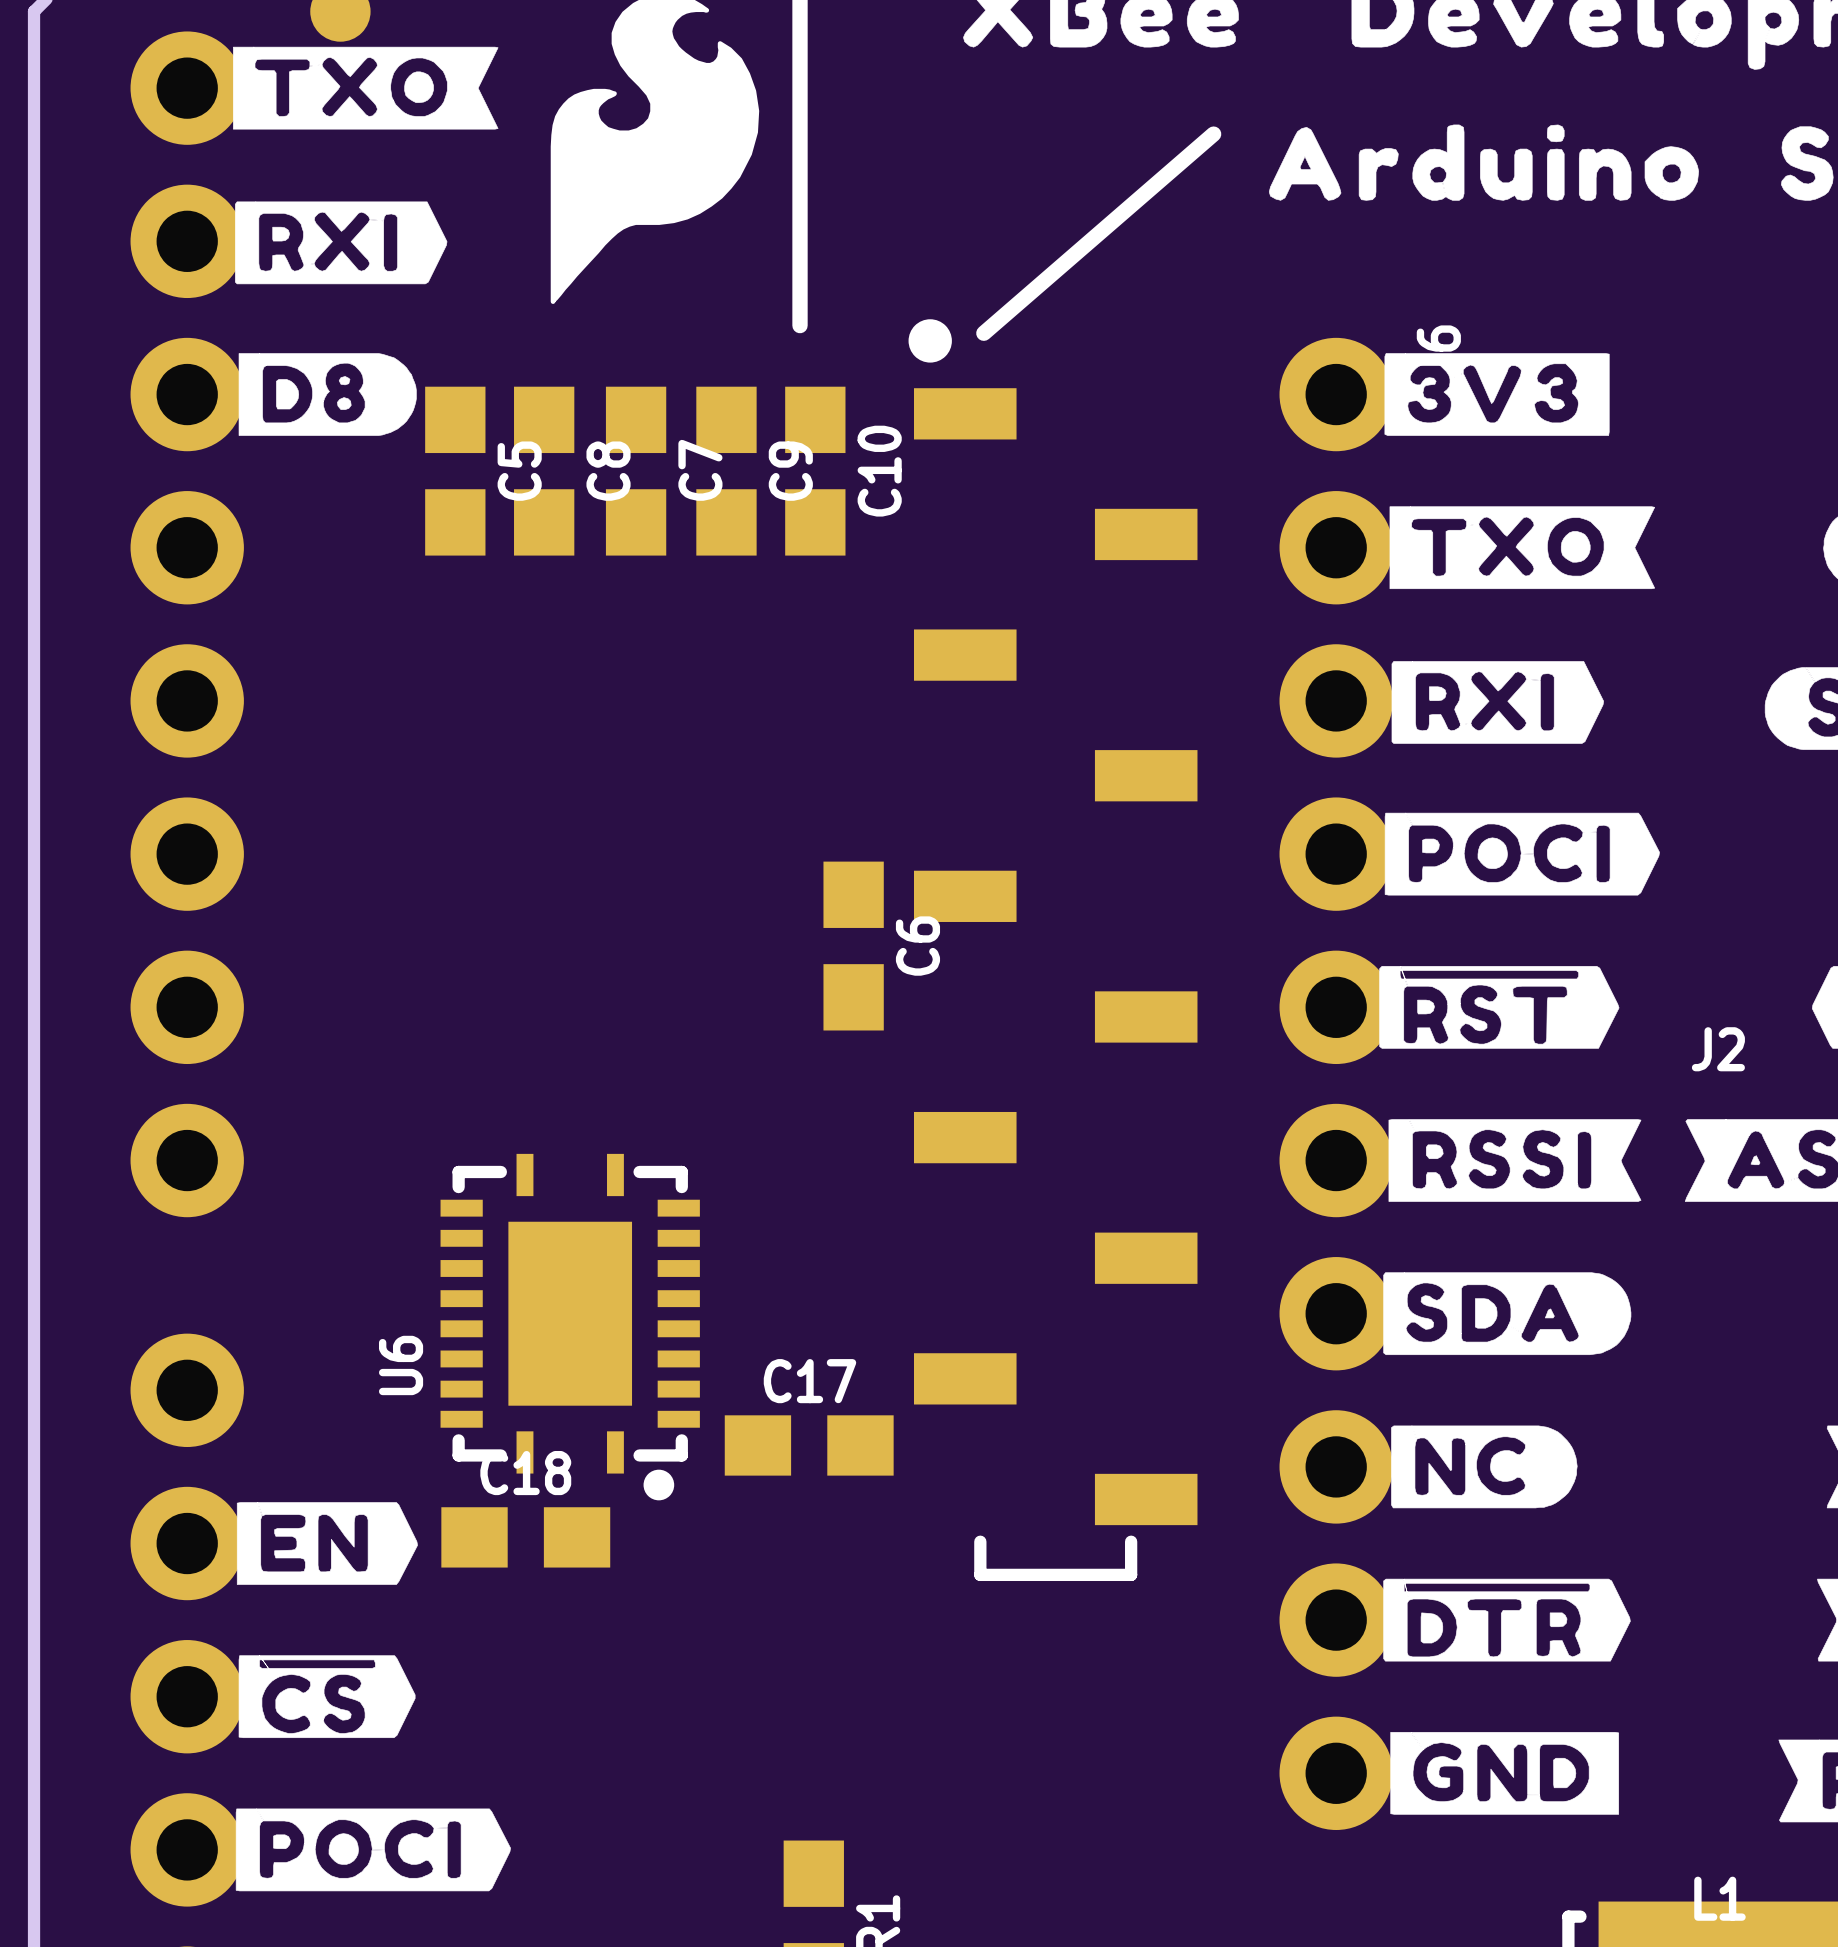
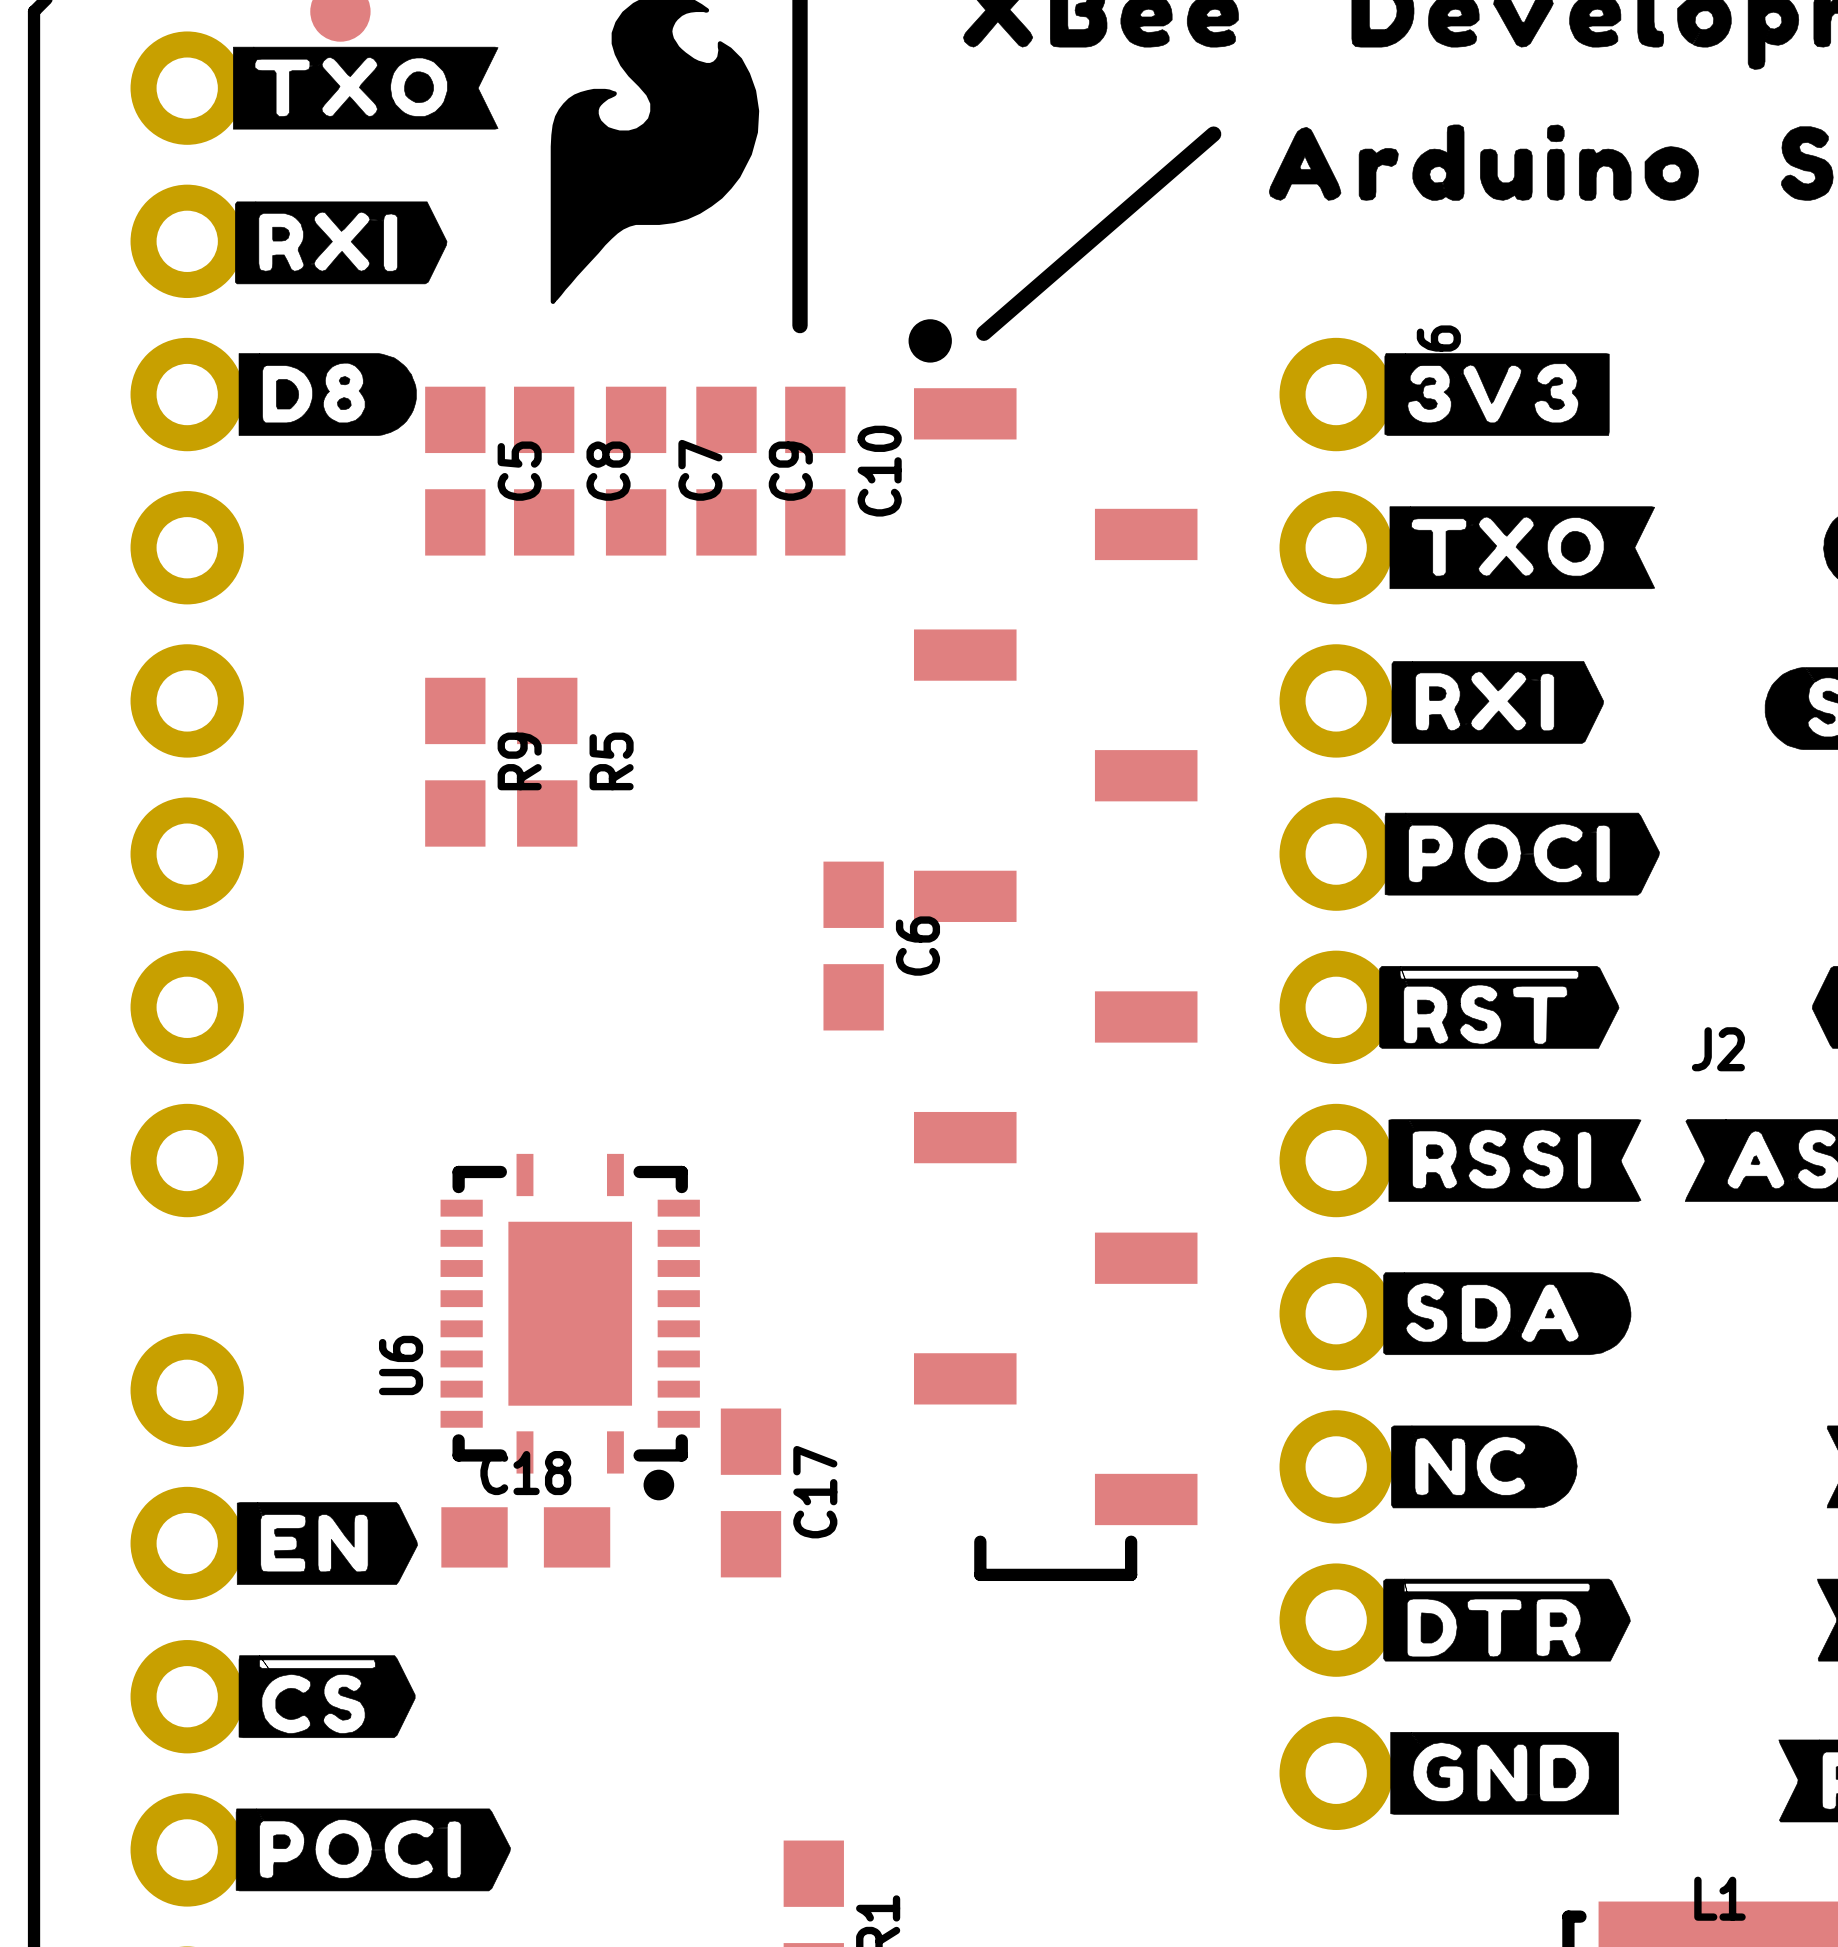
R9: none -> (455, 762)
R5: none -> (547, 762)
C17 rotation: 0° (809, 1445) -> 90° clockwise (750, 1492)

